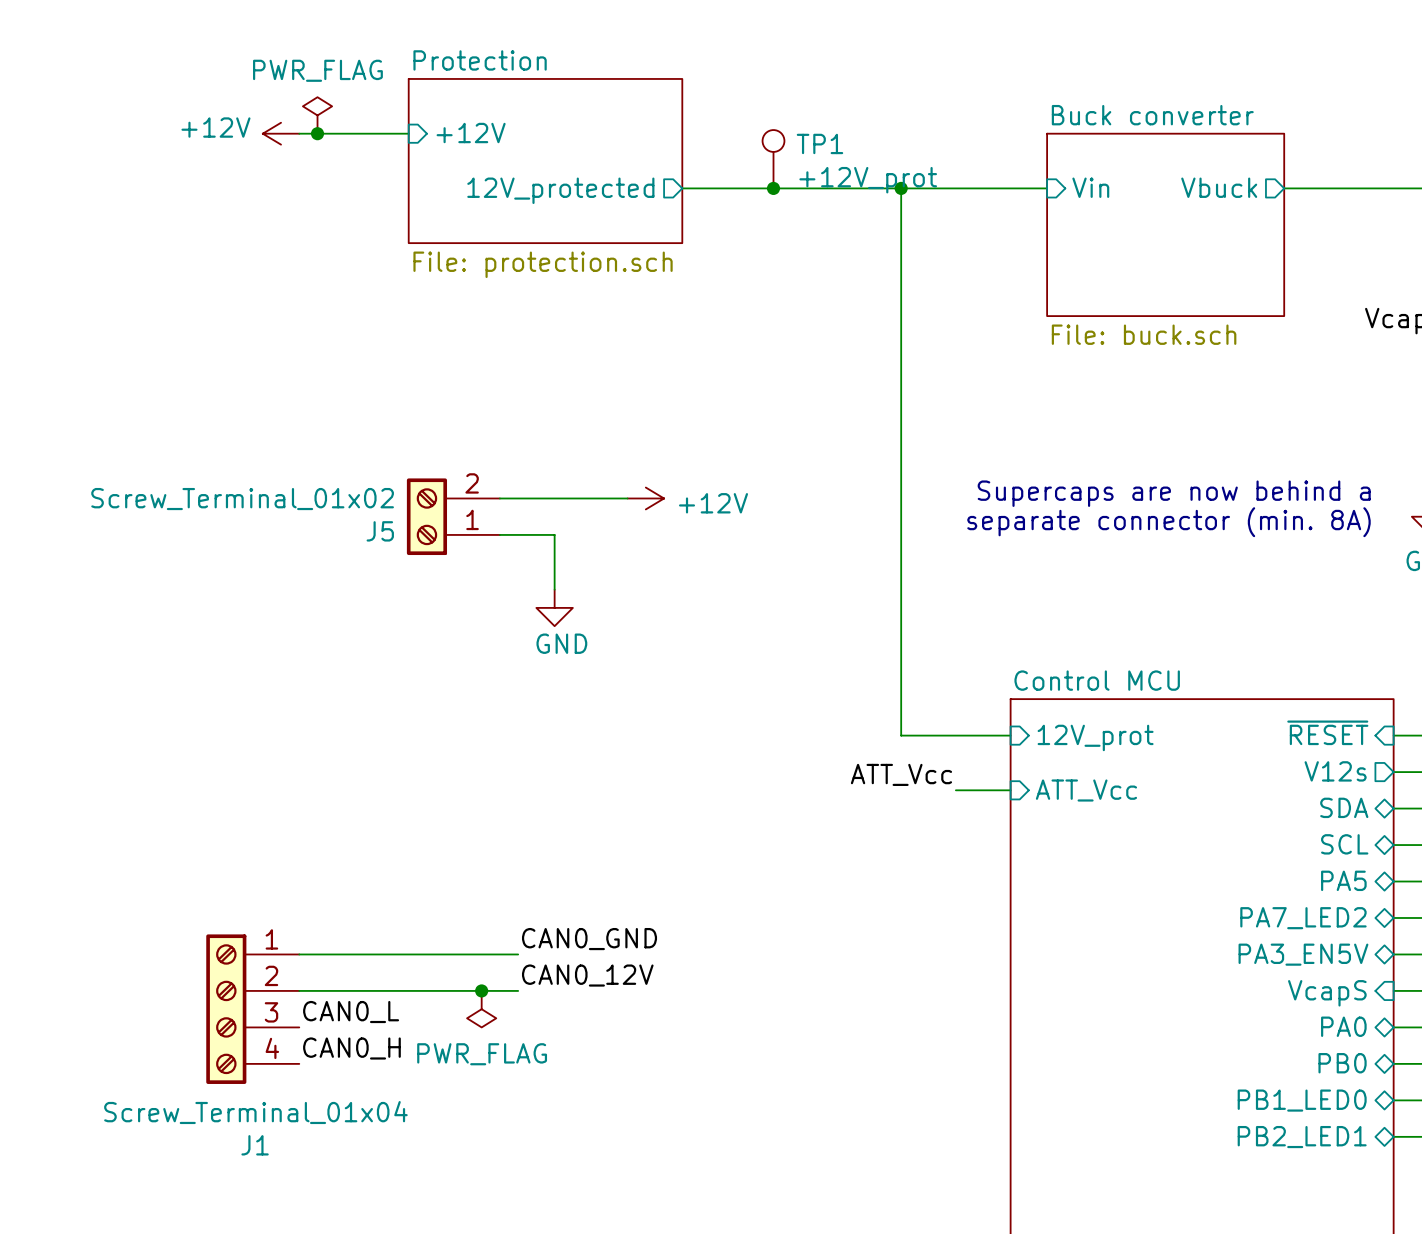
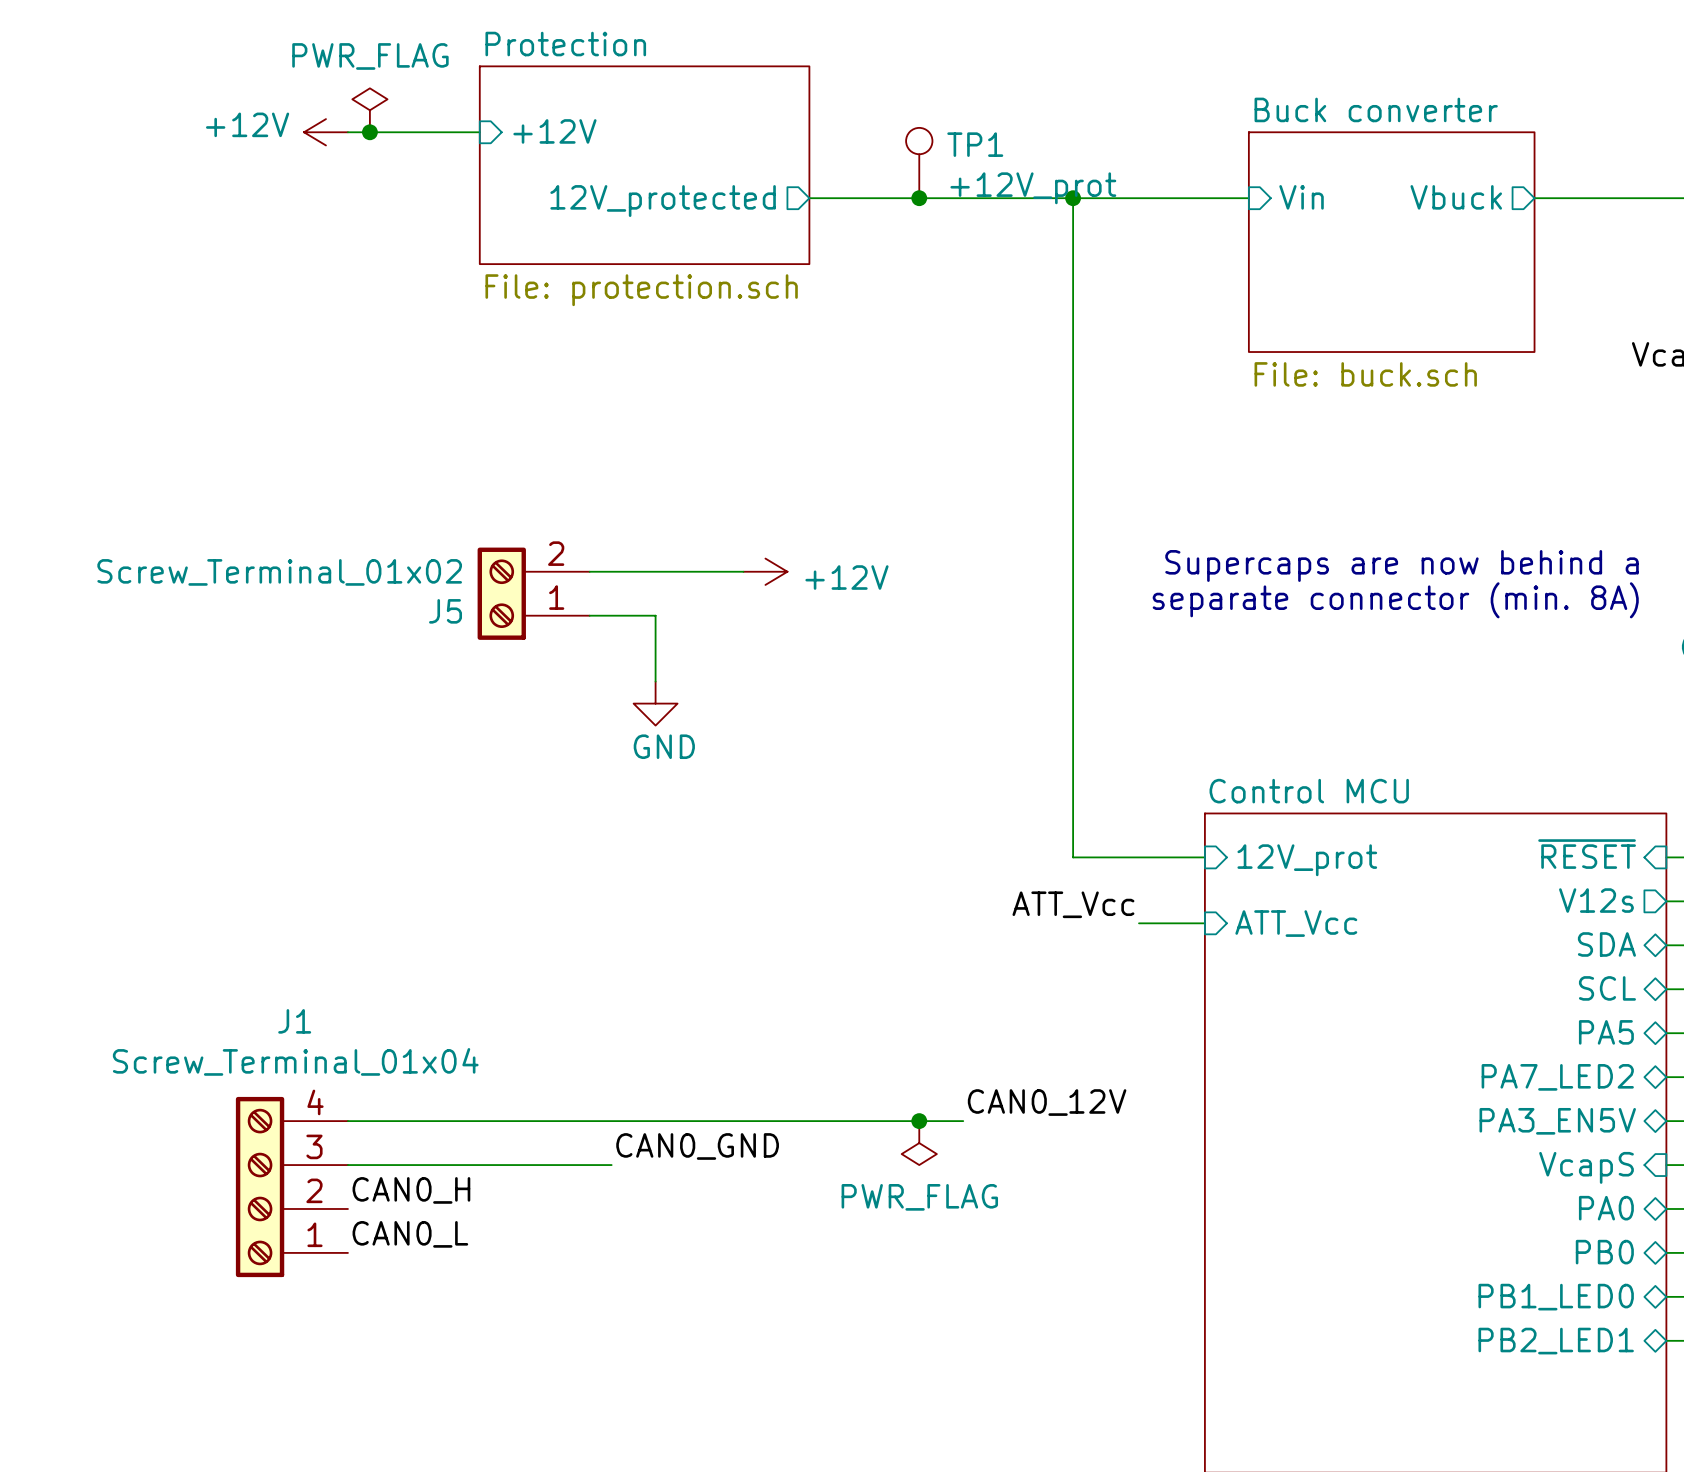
label: CAN0_GND (589, 939) -> none
label: none -> CAN0_12V (1047, 1102)
wire: none -> (611, 1121) (963, 1121)
junction: none -> (919, 1121)
label: CAN0_12V (587, 975) -> CAN0_GND (697, 1146)
junction: (481, 990) -> none
J1 flip: as is (226, 1009) -> up-down (260, 1187)
power symbol position: PWR_FLAG (481, 1009) -> PWR_FLAG (919, 1143)
label: CAN0_L (351, 1012) -> CAN0_H (411, 1190)
label: CAN0_H (351, 1048) -> CAN0_L (410, 1234)

